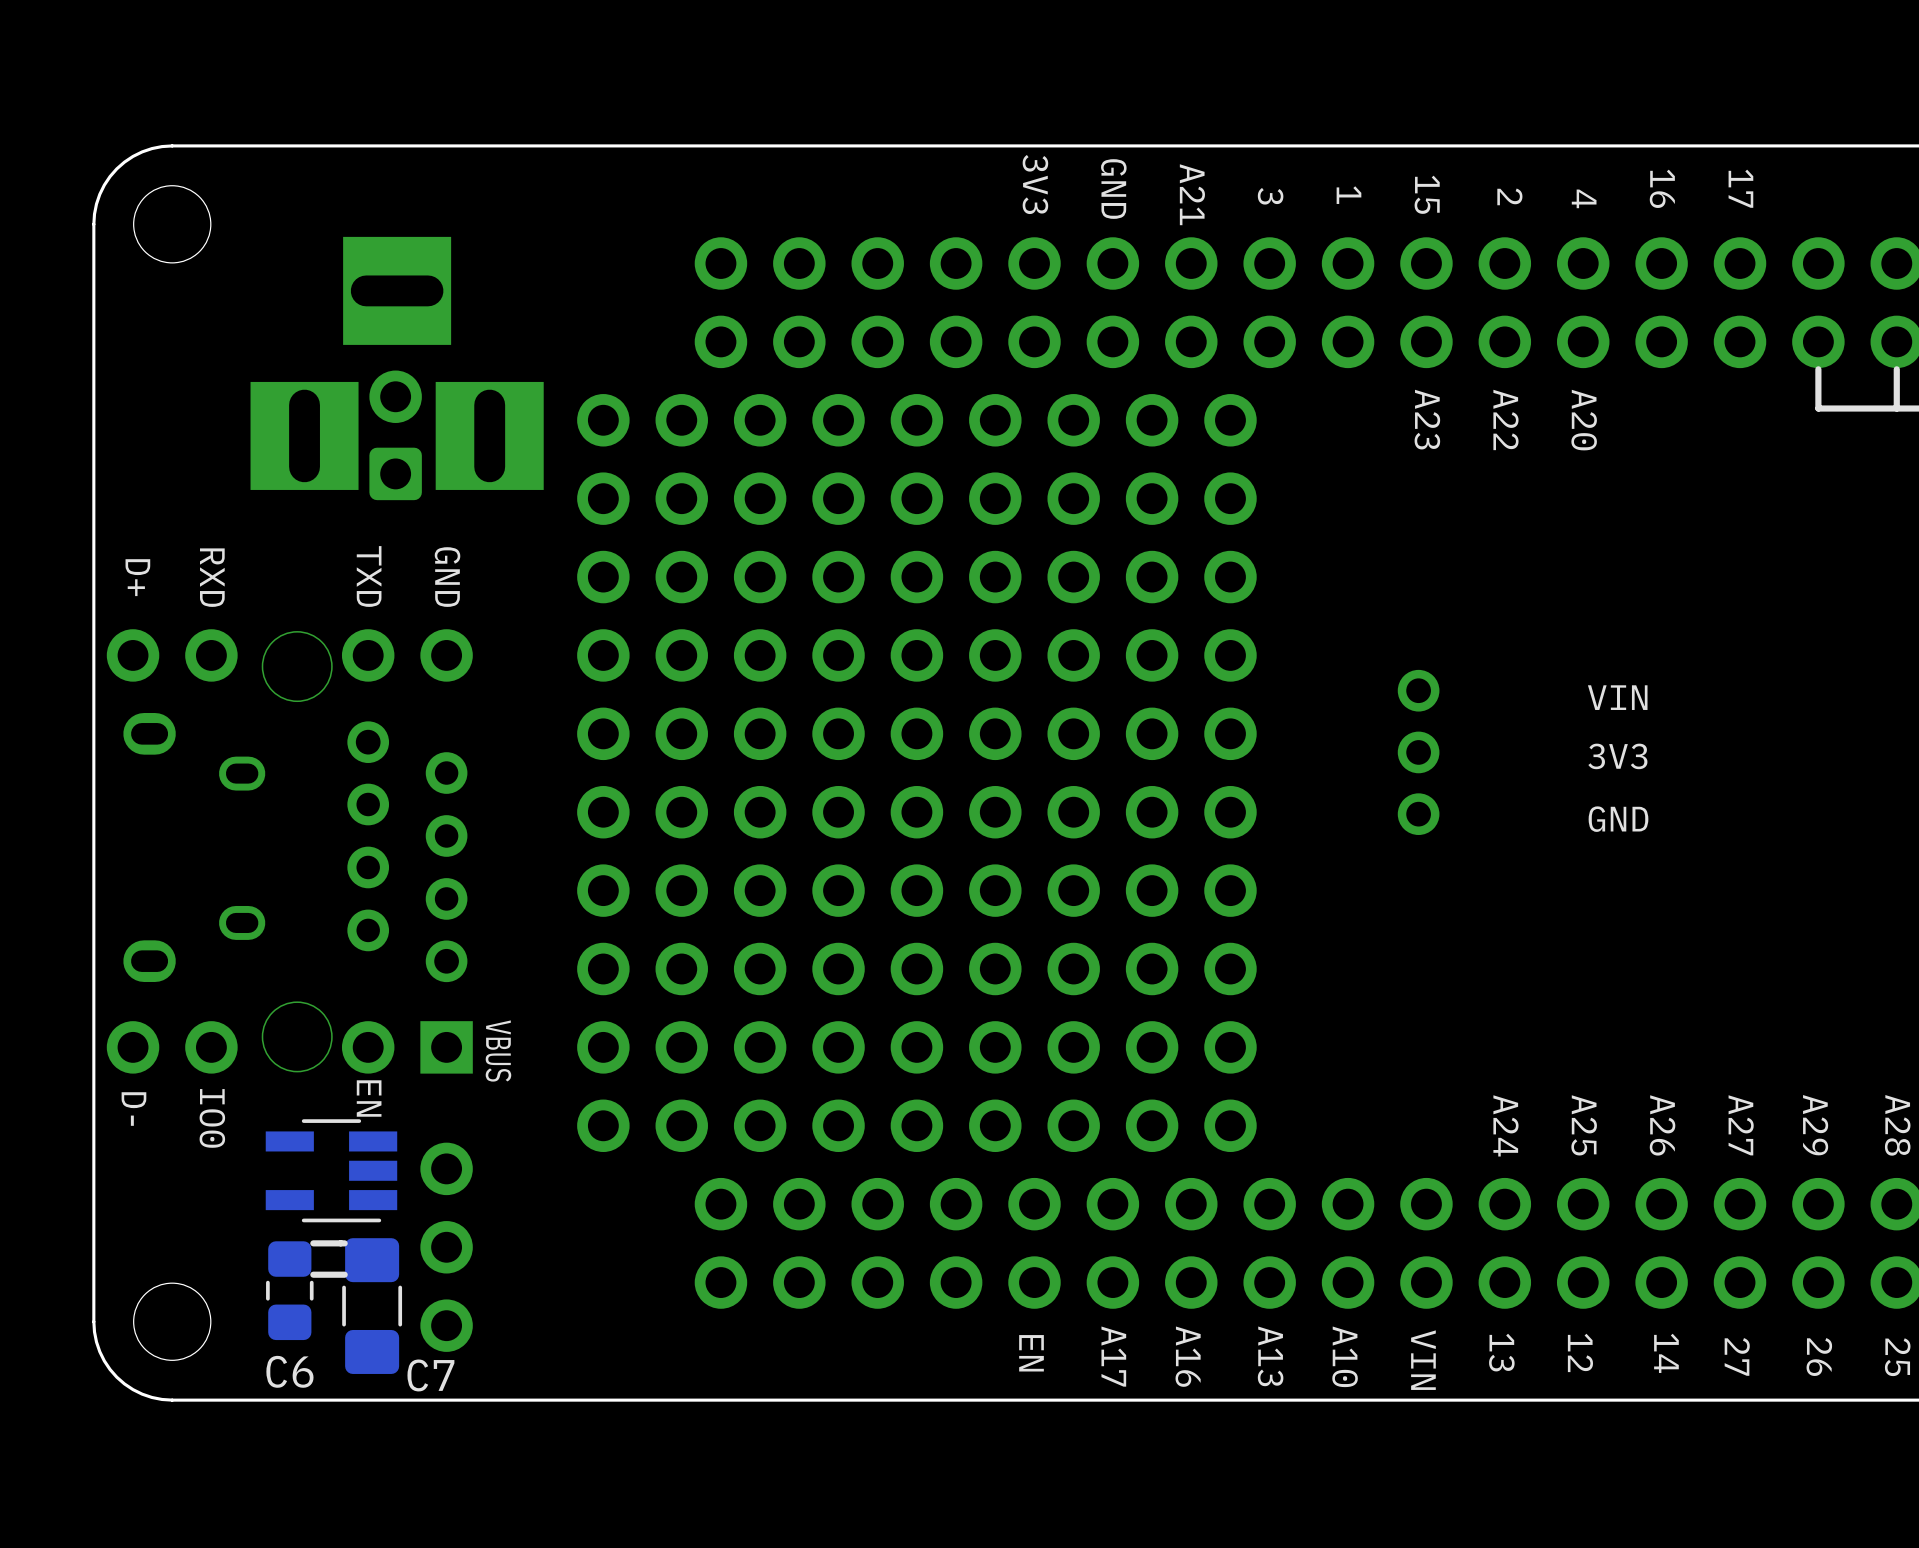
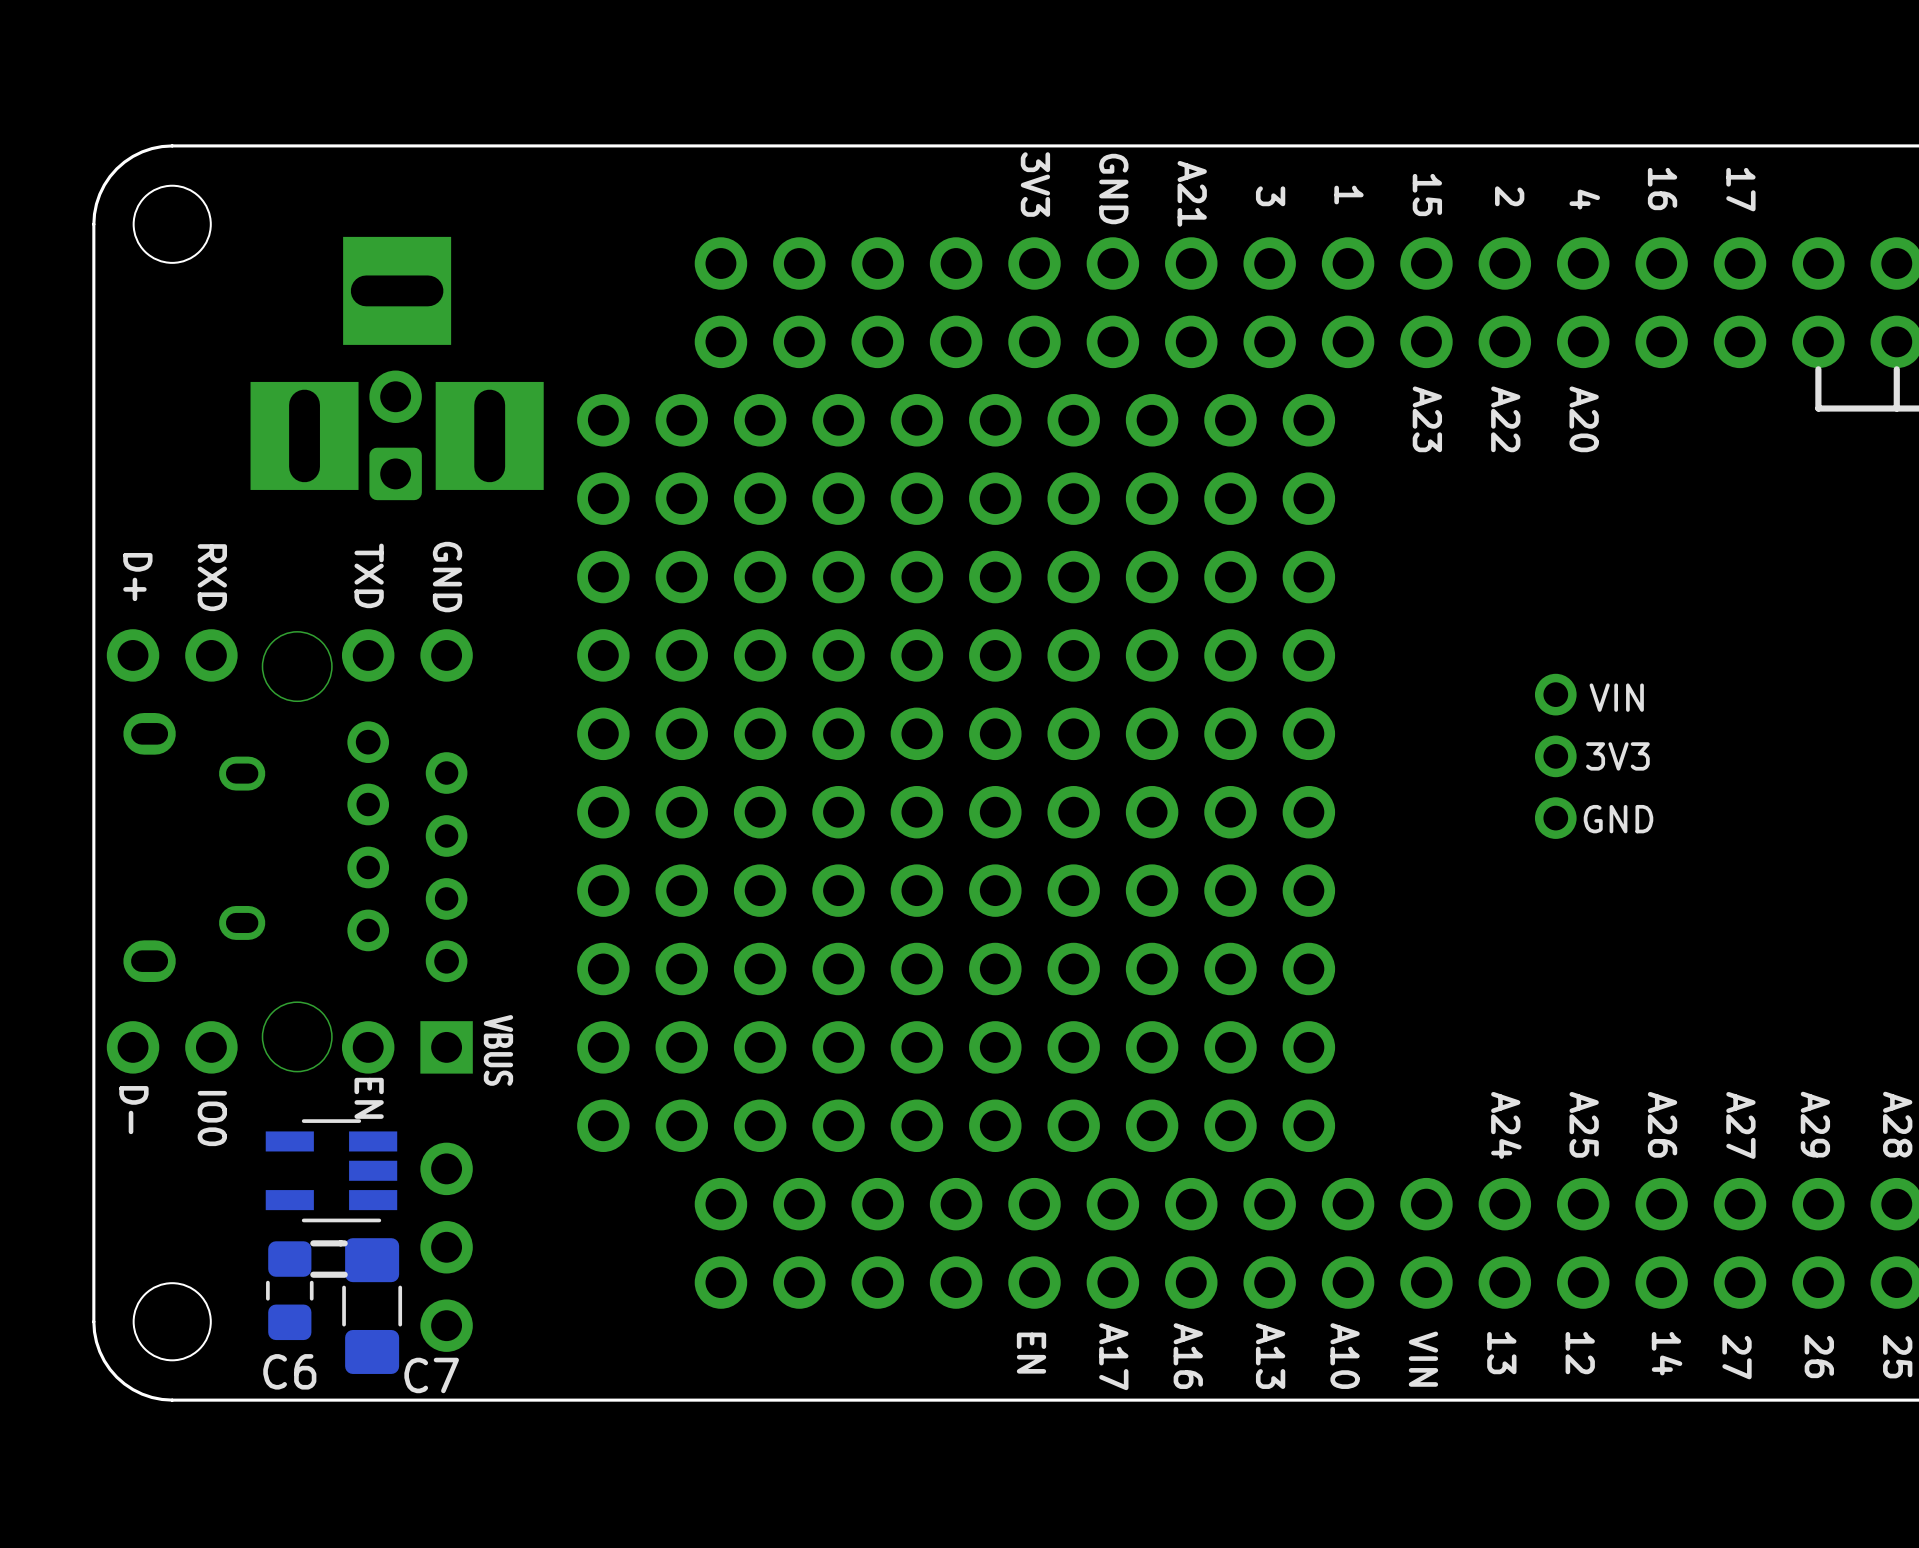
part position: (1418, 752) -> (1555, 756)
part: none -> (956, 773)

